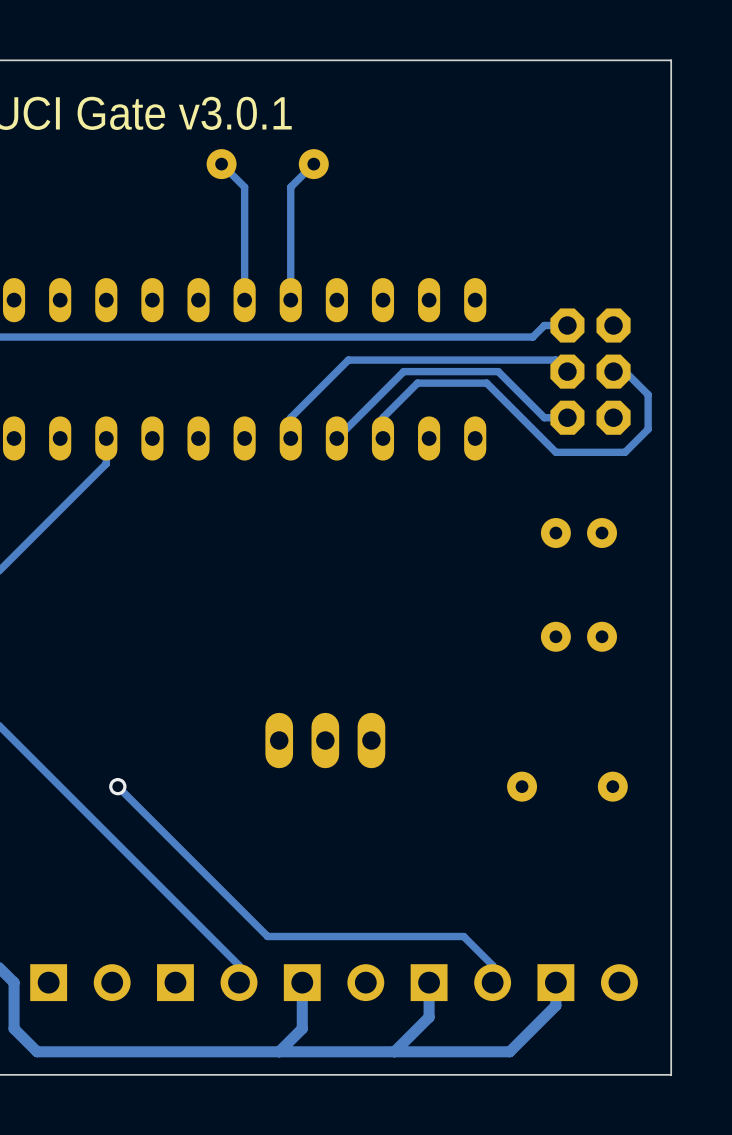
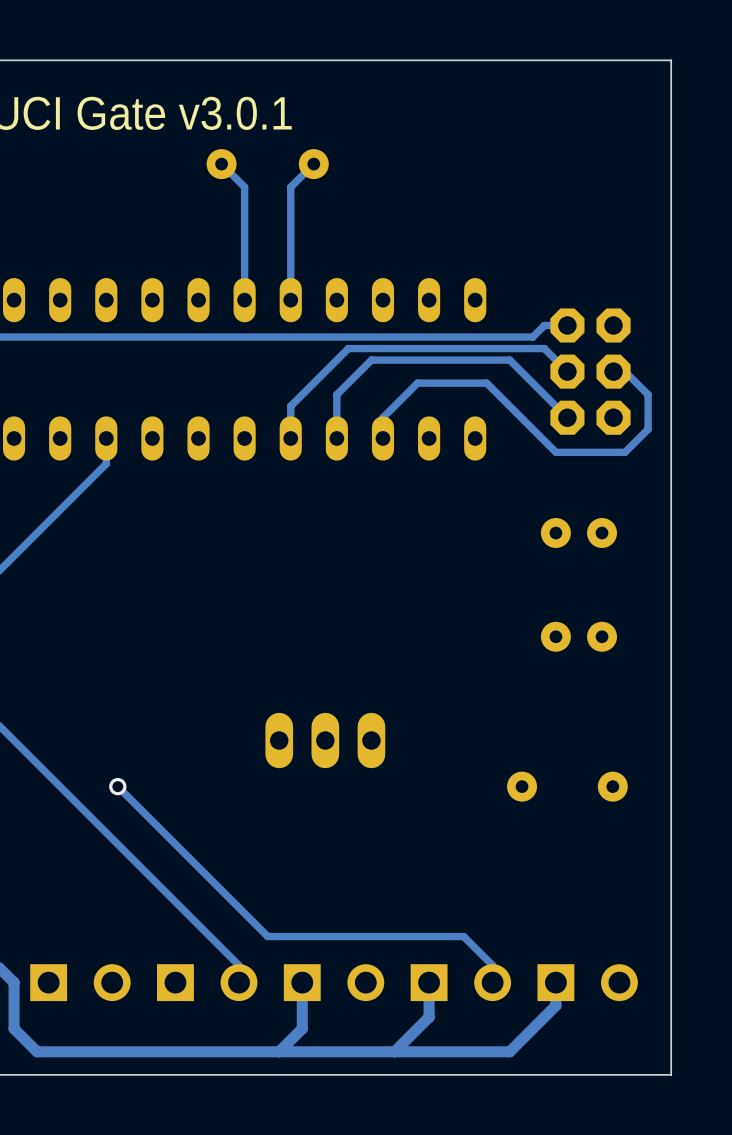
track: (371, 360) (348, 360) (290, 417) -> (371, 360) (336, 394) (336, 438)
track: (555, 360) (509, 360) -> (567, 417) (509, 360)
track: none -> (555, 360) (544, 348) (348, 348) (290, 406) (290, 417)
track: (567, 417) (544, 417) (498, 371) (403, 371) (336, 438) -> none

